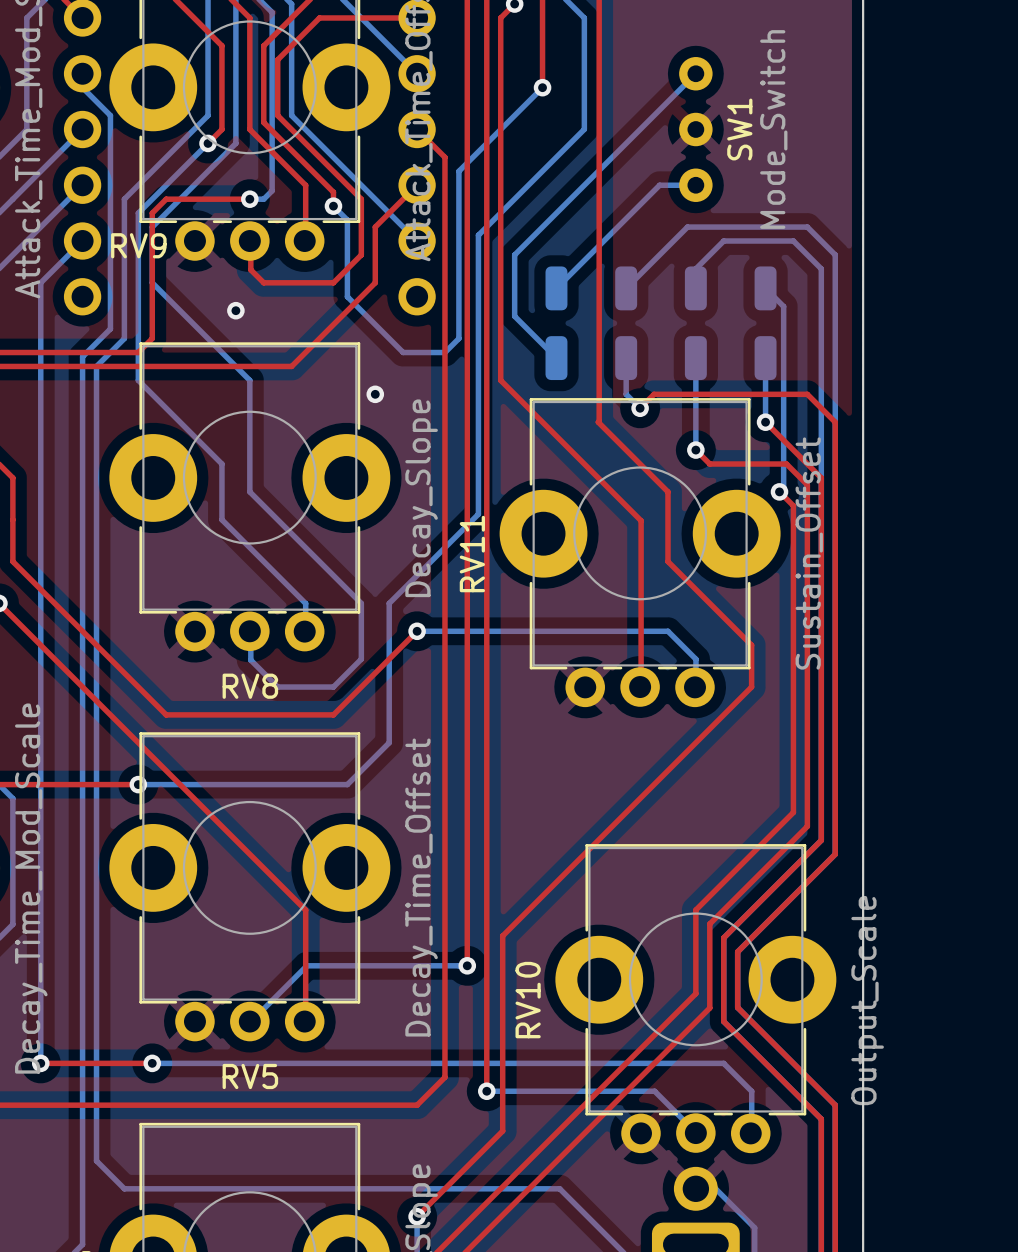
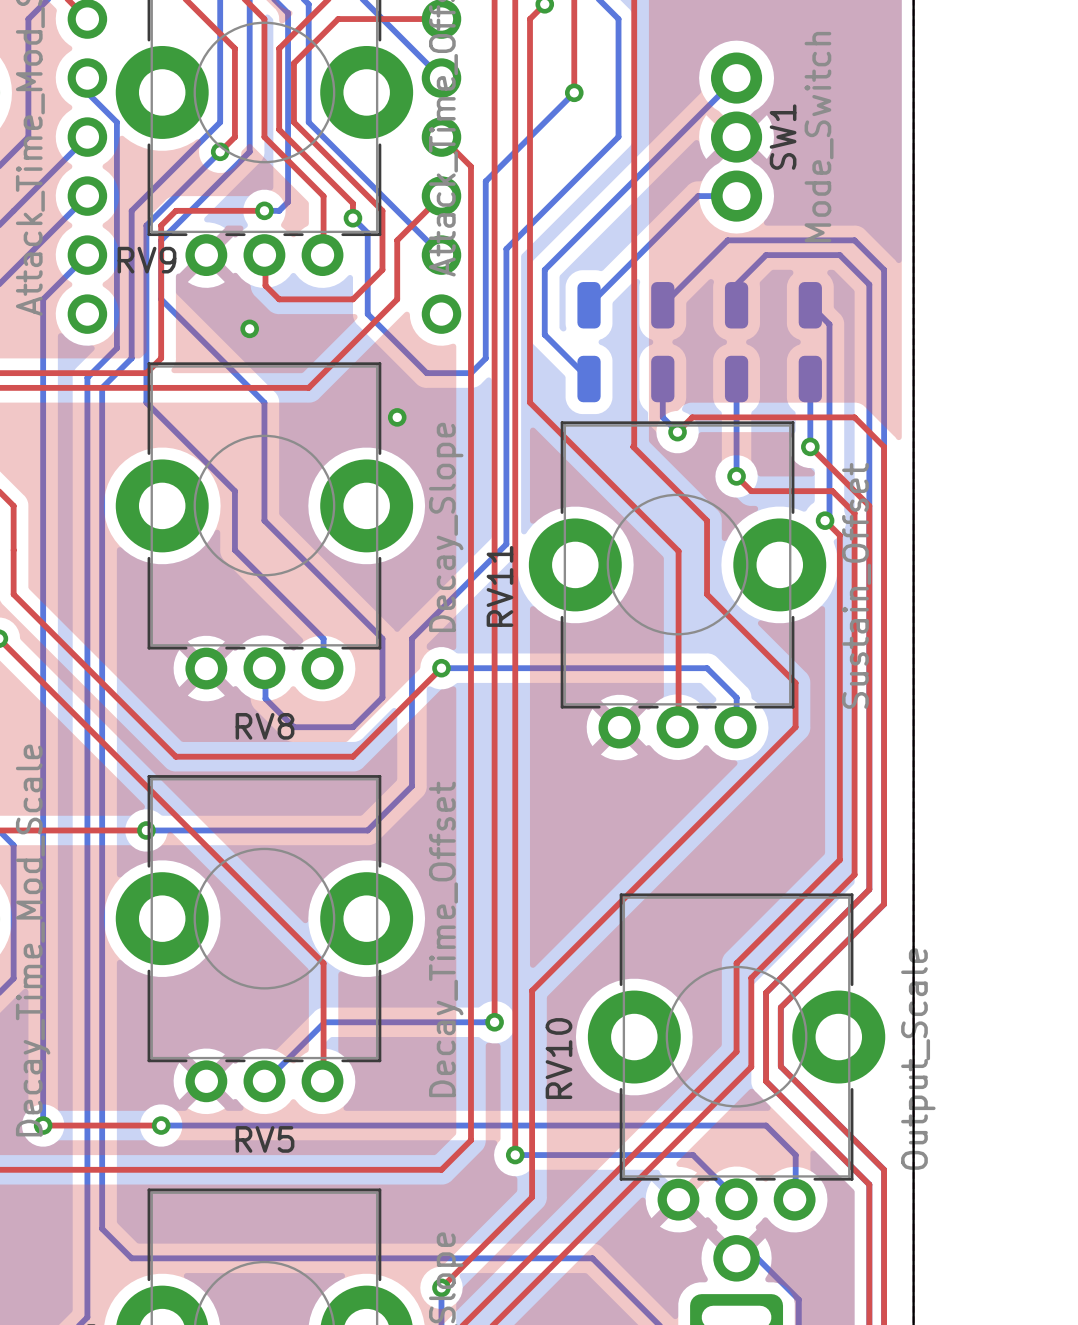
SW1 footprint: [679, 57, 713, 202] -> [711, 52, 763, 222]

